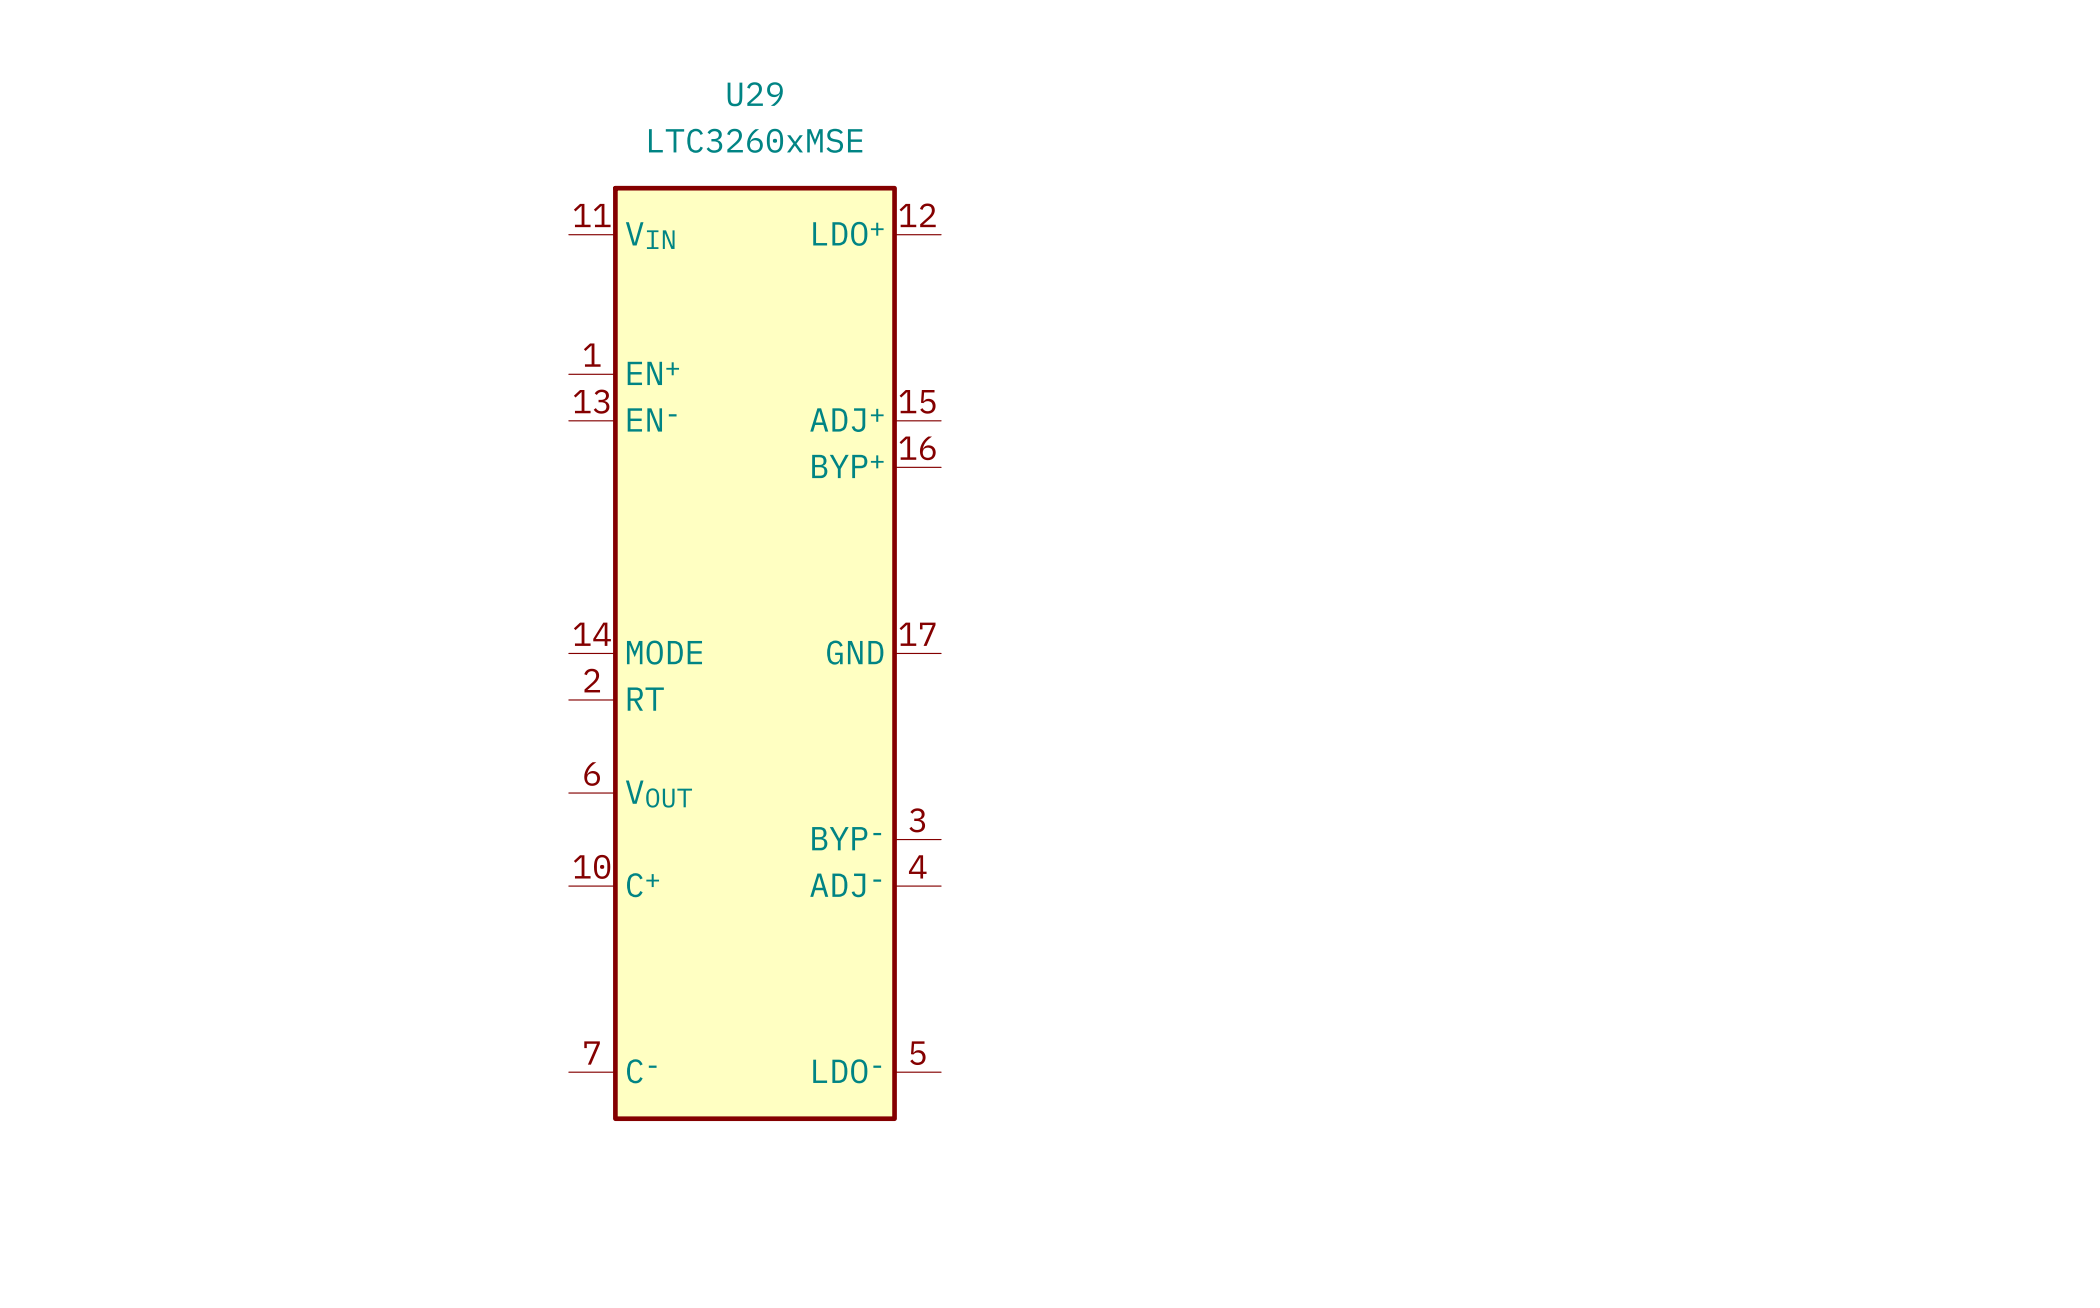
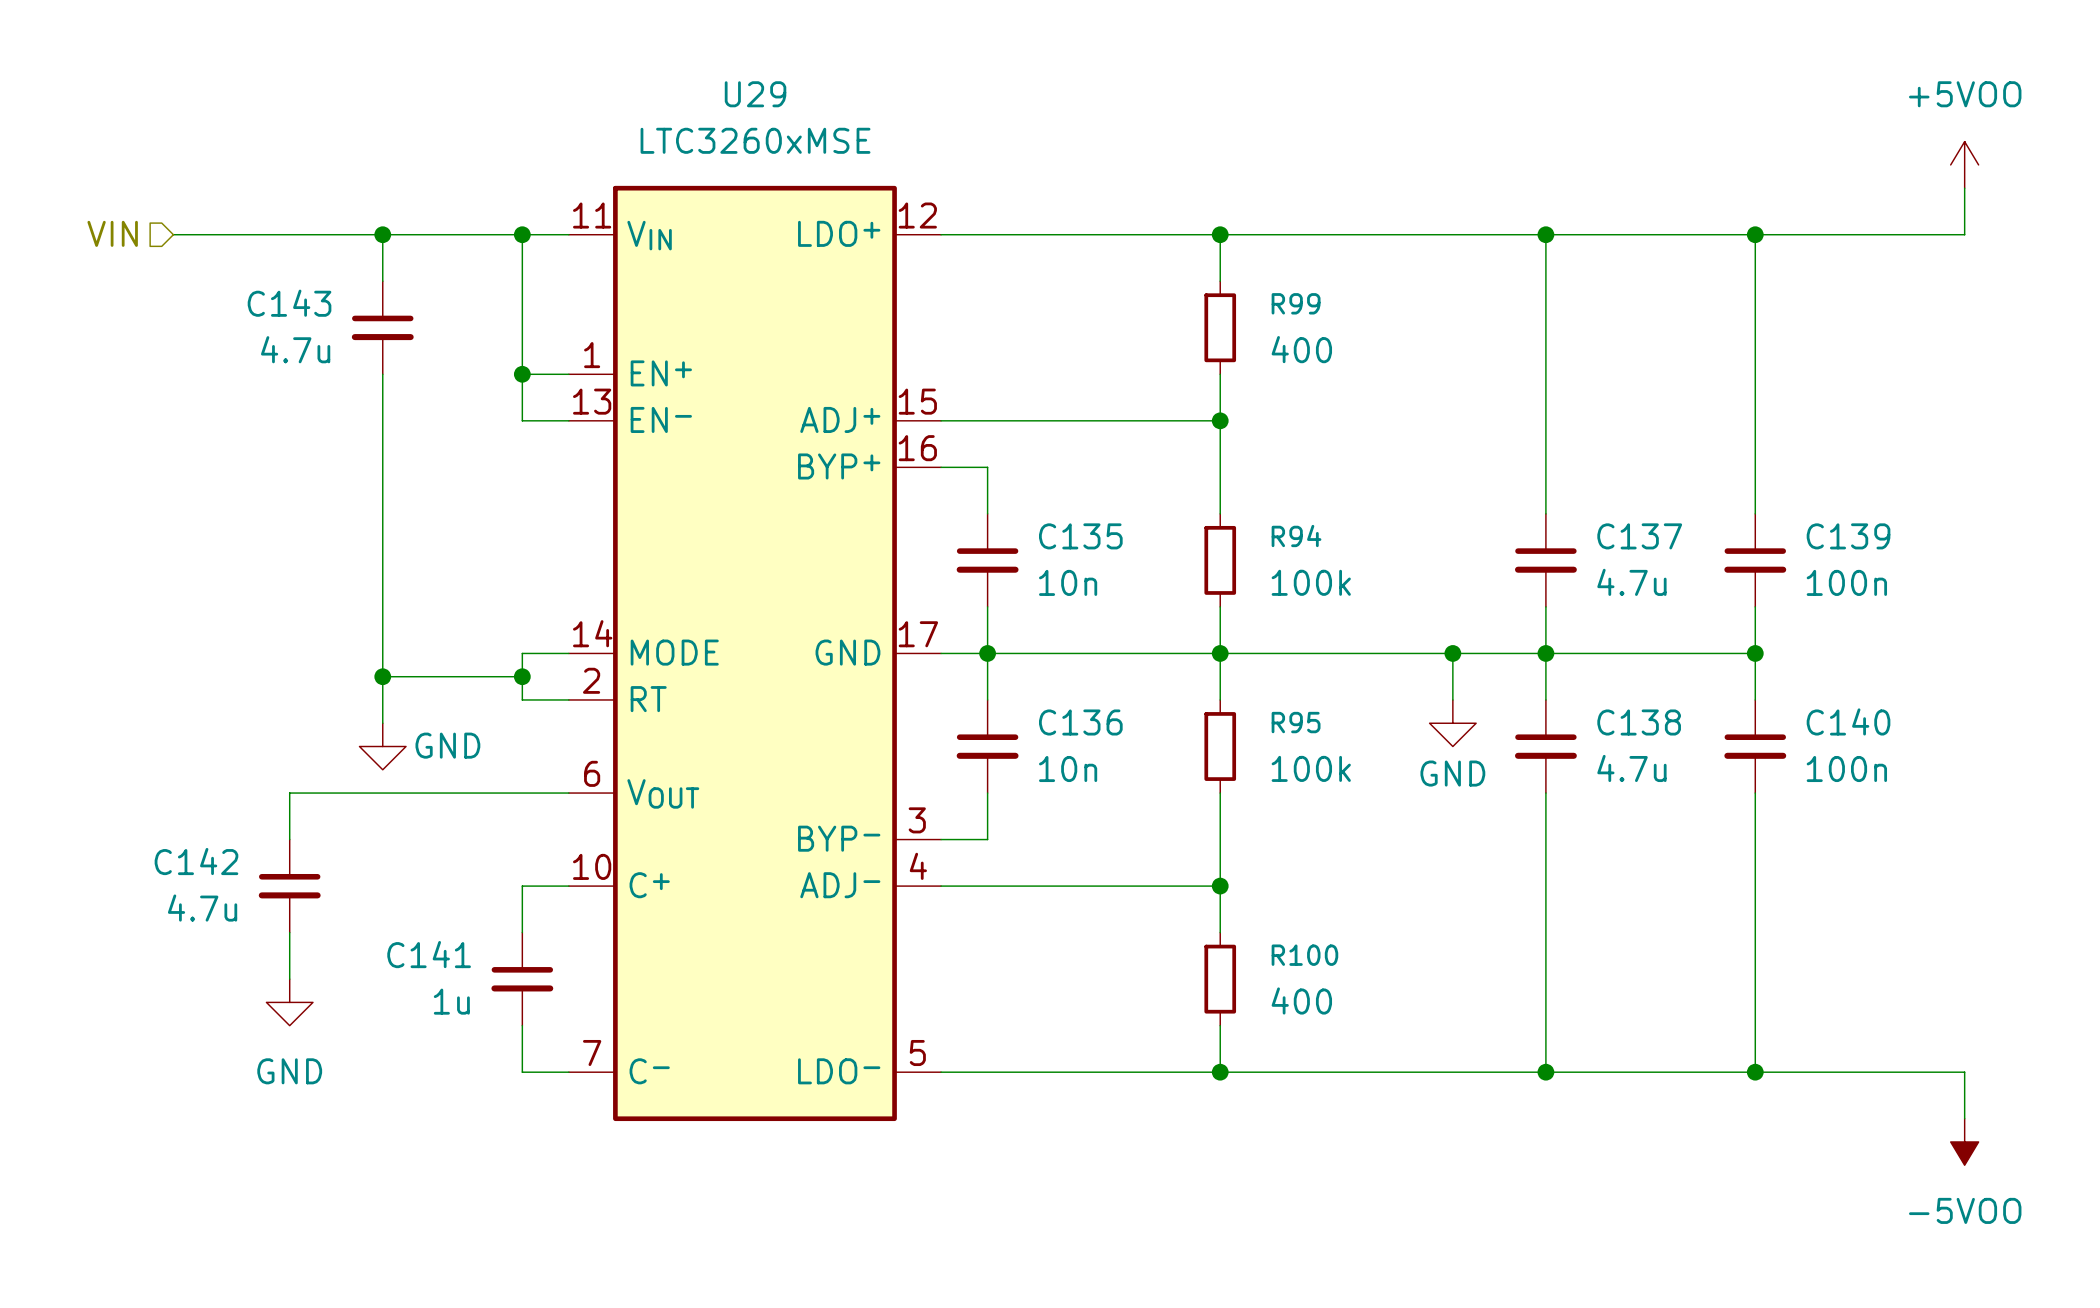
power symbol: none -> +5VOO (1964, 164)
wire: none -> (1964, 188) (1964, 234) (941, 234)
hierarchical label: none -> VIN (112, 233)
wire: none -> (173, 234) (568, 234)
wire: none -> (382, 234) (382, 281)
junction: none -> (382, 234)
wire: none -> (522, 234) (522, 420) (568, 420)
junction: none -> (522, 234)
wire: none -> (1220, 234) (1220, 281)
junction: none -> (1220, 234)
wire: none -> (1545, 234) (1545, 513)
junction: none -> (1545, 234)
wire: none -> (1755, 234) (1755, 513)
junction: none -> (1755, 234)
C143: none -> 4.7u (382, 327)
R99: none -> 400 (1220, 327)
wire: none -> (382, 374) (382, 723)
wire: none -> (522, 374) (568, 374)
junction: none -> (522, 374)
wire: none -> (1220, 374) (1220, 513)
wire: none -> (941, 420) (1220, 420)
junction: none -> (1220, 420)
wire: none -> (941, 467) (987, 467) (987, 513)
C135: none -> 10n (987, 560)
R94: none -> 100k (1220, 560)
C137: none -> 4.7u (1545, 560)
C139: none -> 100n (1755, 560)
wire: none -> (987, 606) (987, 699)
wire: none -> (1220, 606) (1220, 699)
wire: none -> (1545, 606) (1545, 699)
wire: none -> (1755, 606) (1755, 699)
wire: none -> (568, 653) (522, 653) (522, 699) (568, 699)
wire: none -> (941, 653) (1755, 653)
junction: none -> (987, 653)
junction: none -> (1220, 653)
wire: none -> (1452, 653) (1452, 699)
junction: none -> (1452, 653)
junction: none -> (1545, 653)
junction: none -> (1755, 653)
wire: none -> (382, 676) (522, 676)
junction: none -> (382, 676)
junction: none -> (522, 676)
power symbol: none -> GND (1452, 723)
power symbol: none -> GND (382, 746)
C136: none -> 10n (987, 746)
R95: none -> 100k (1220, 746)
C138: none -> 4.7u (1545, 746)
C140: none -> 100n (1755, 746)
wire: none -> (568, 793) (289, 793) (289, 839)
wire: none -> (987, 793) (987, 839) (941, 839)
wire: none -> (1220, 793) (1220, 932)
wire: none -> (1545, 793) (1545, 1072)
wire: none -> (1755, 793) (1755, 1072)
C142: none -> 4.7u (289, 886)
wire: none -> (568, 886) (522, 886) (522, 932)
wire: none -> (941, 886) (1220, 886)
junction: none -> (1220, 886)
wire: none -> (289, 932) (289, 979)
C141: none -> 1u (522, 979)
R100: none -> 400 (1220, 979)
power symbol: none -> GND (289, 1002)
wire: none -> (522, 1025) (522, 1072) (568, 1072)
wire: none -> (1220, 1025) (1220, 1072)
wire: none -> (941, 1072) (1964, 1072) (1964, 1118)
junction: none -> (1220, 1072)
junction: none -> (1545, 1072)
junction: none -> (1755, 1072)
power symbol: none -> -5VOO (1964, 1141)

